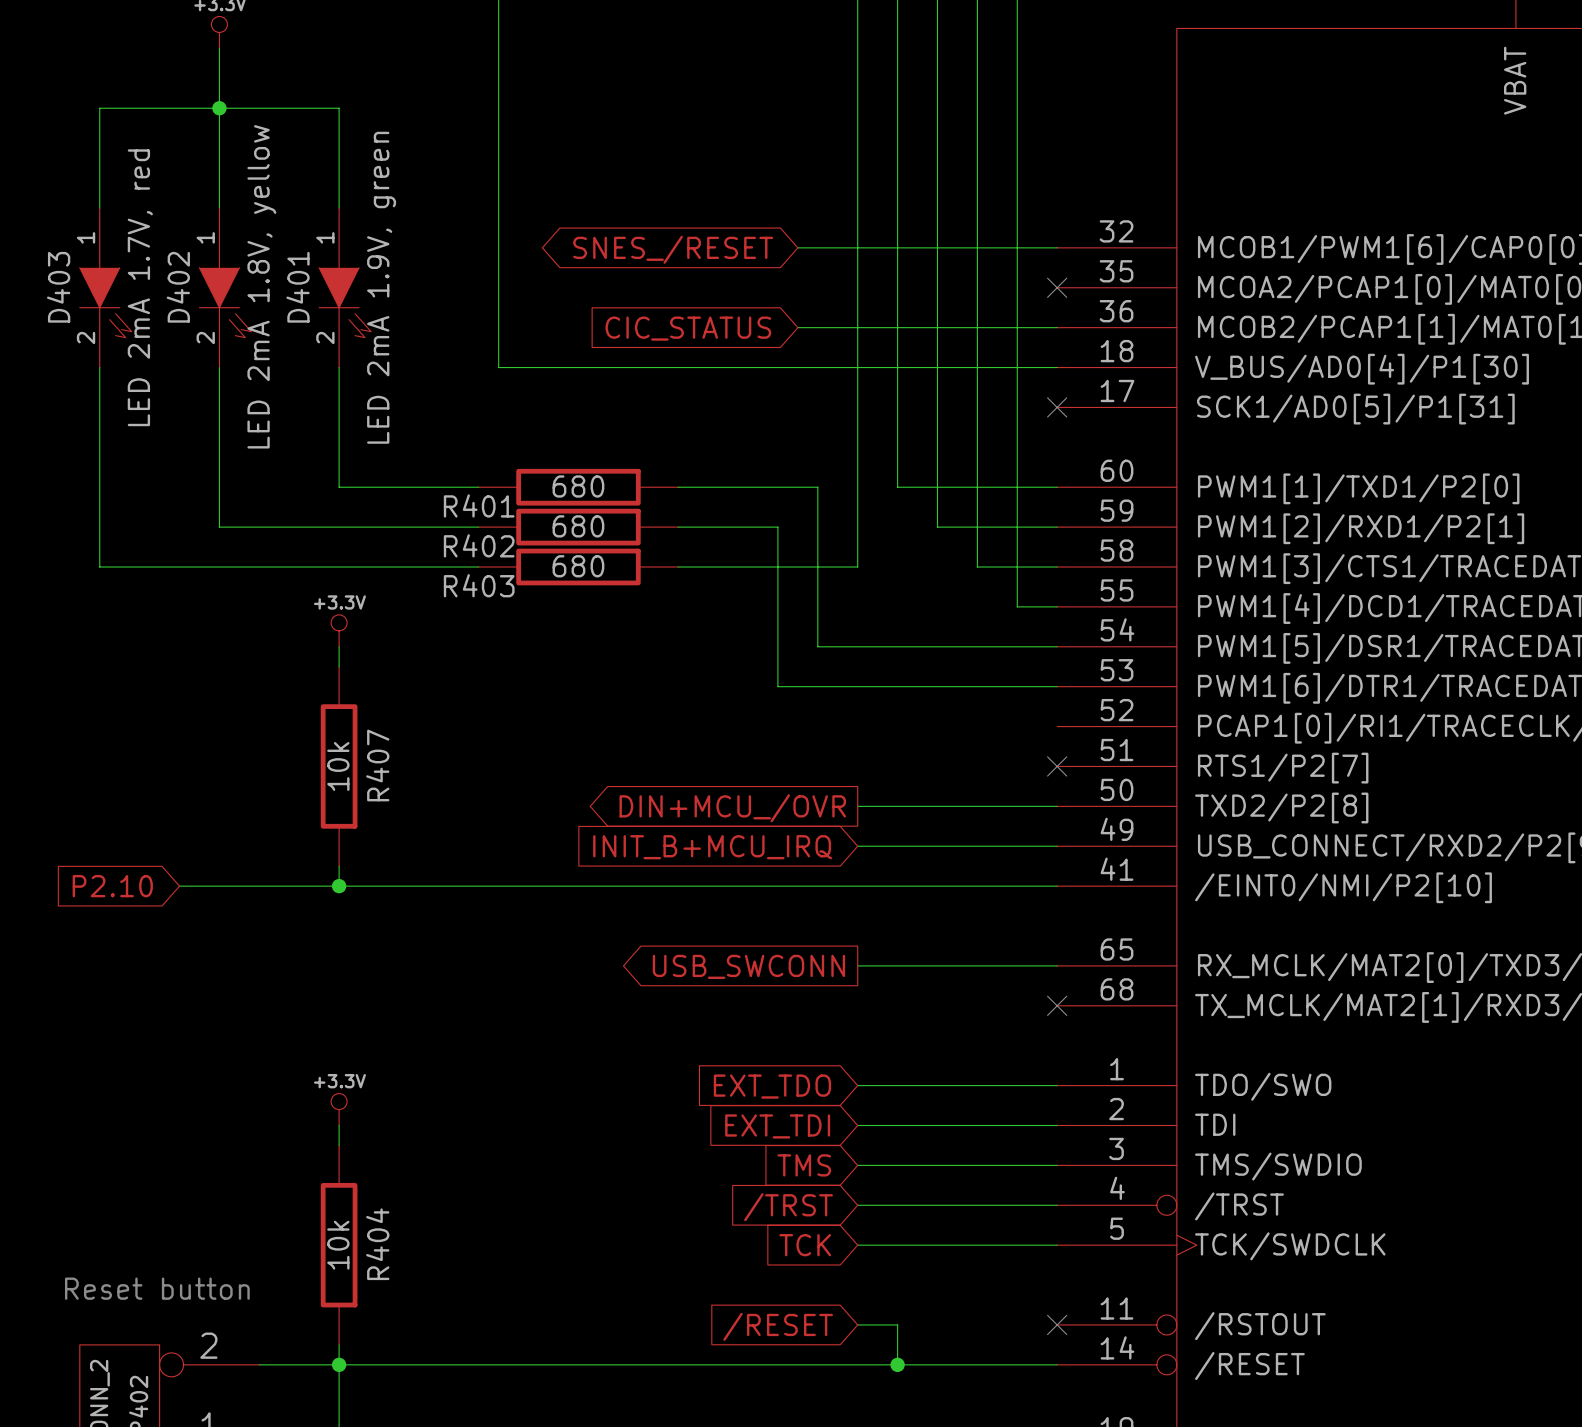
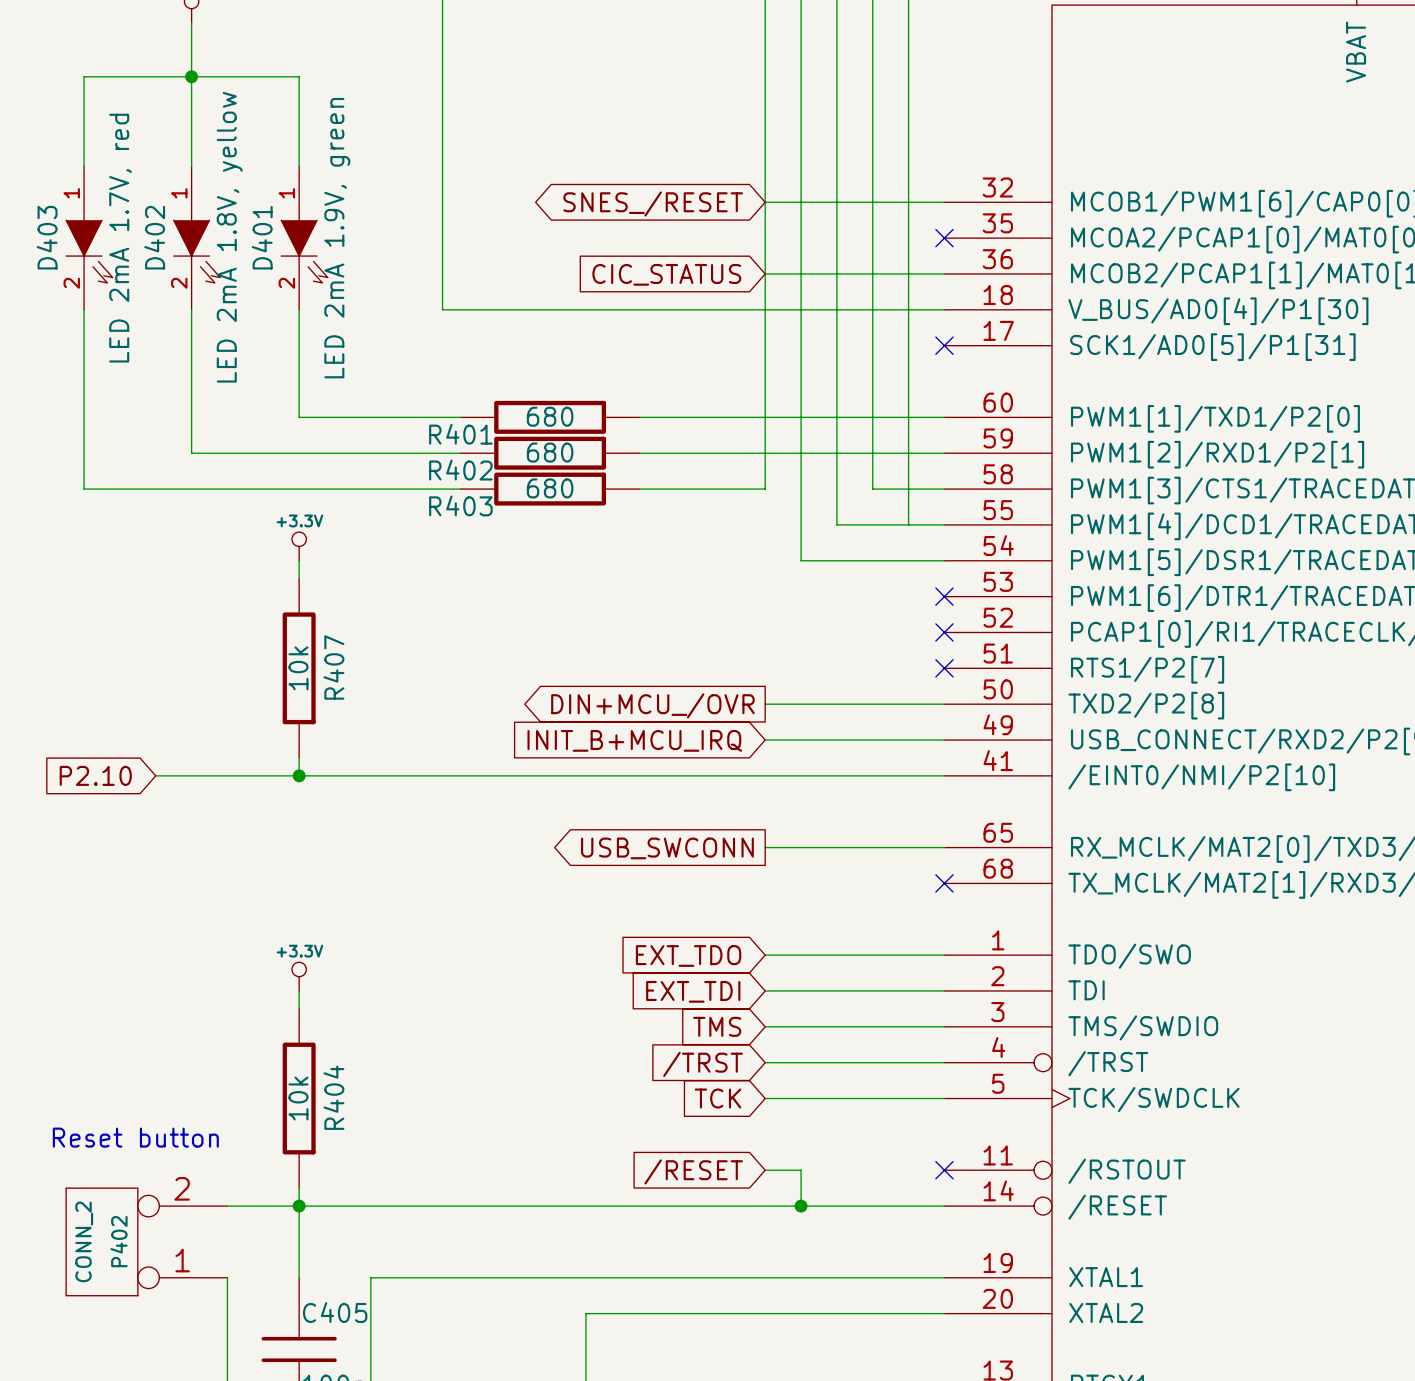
wire: (797, 247) (857, 247) -> none
global label position: SNES_/RESET (673, 249) -> SNES_/RESET (653, 203)
wire: (797, 327) (857, 327) -> none
global label position: CIC_STATUS (688, 328) -> CIC_STATUS (666, 274)
R401 position: (578, 487) -> (550, 417)
wire: (817, 487) (817, 646) (897, 646) -> (729, 417) (801, 417) (801, 560)
R402 position: (578, 527) -> (550, 453)
wire: (777, 527) (777, 686) (1057, 686) -> (693, 453) (836, 453) (836, 524) (908, 524)
R403 position: (578, 567) -> (550, 489)
no-connect mark: none -> (944, 596)
no-connect mark: none -> (944, 632)

